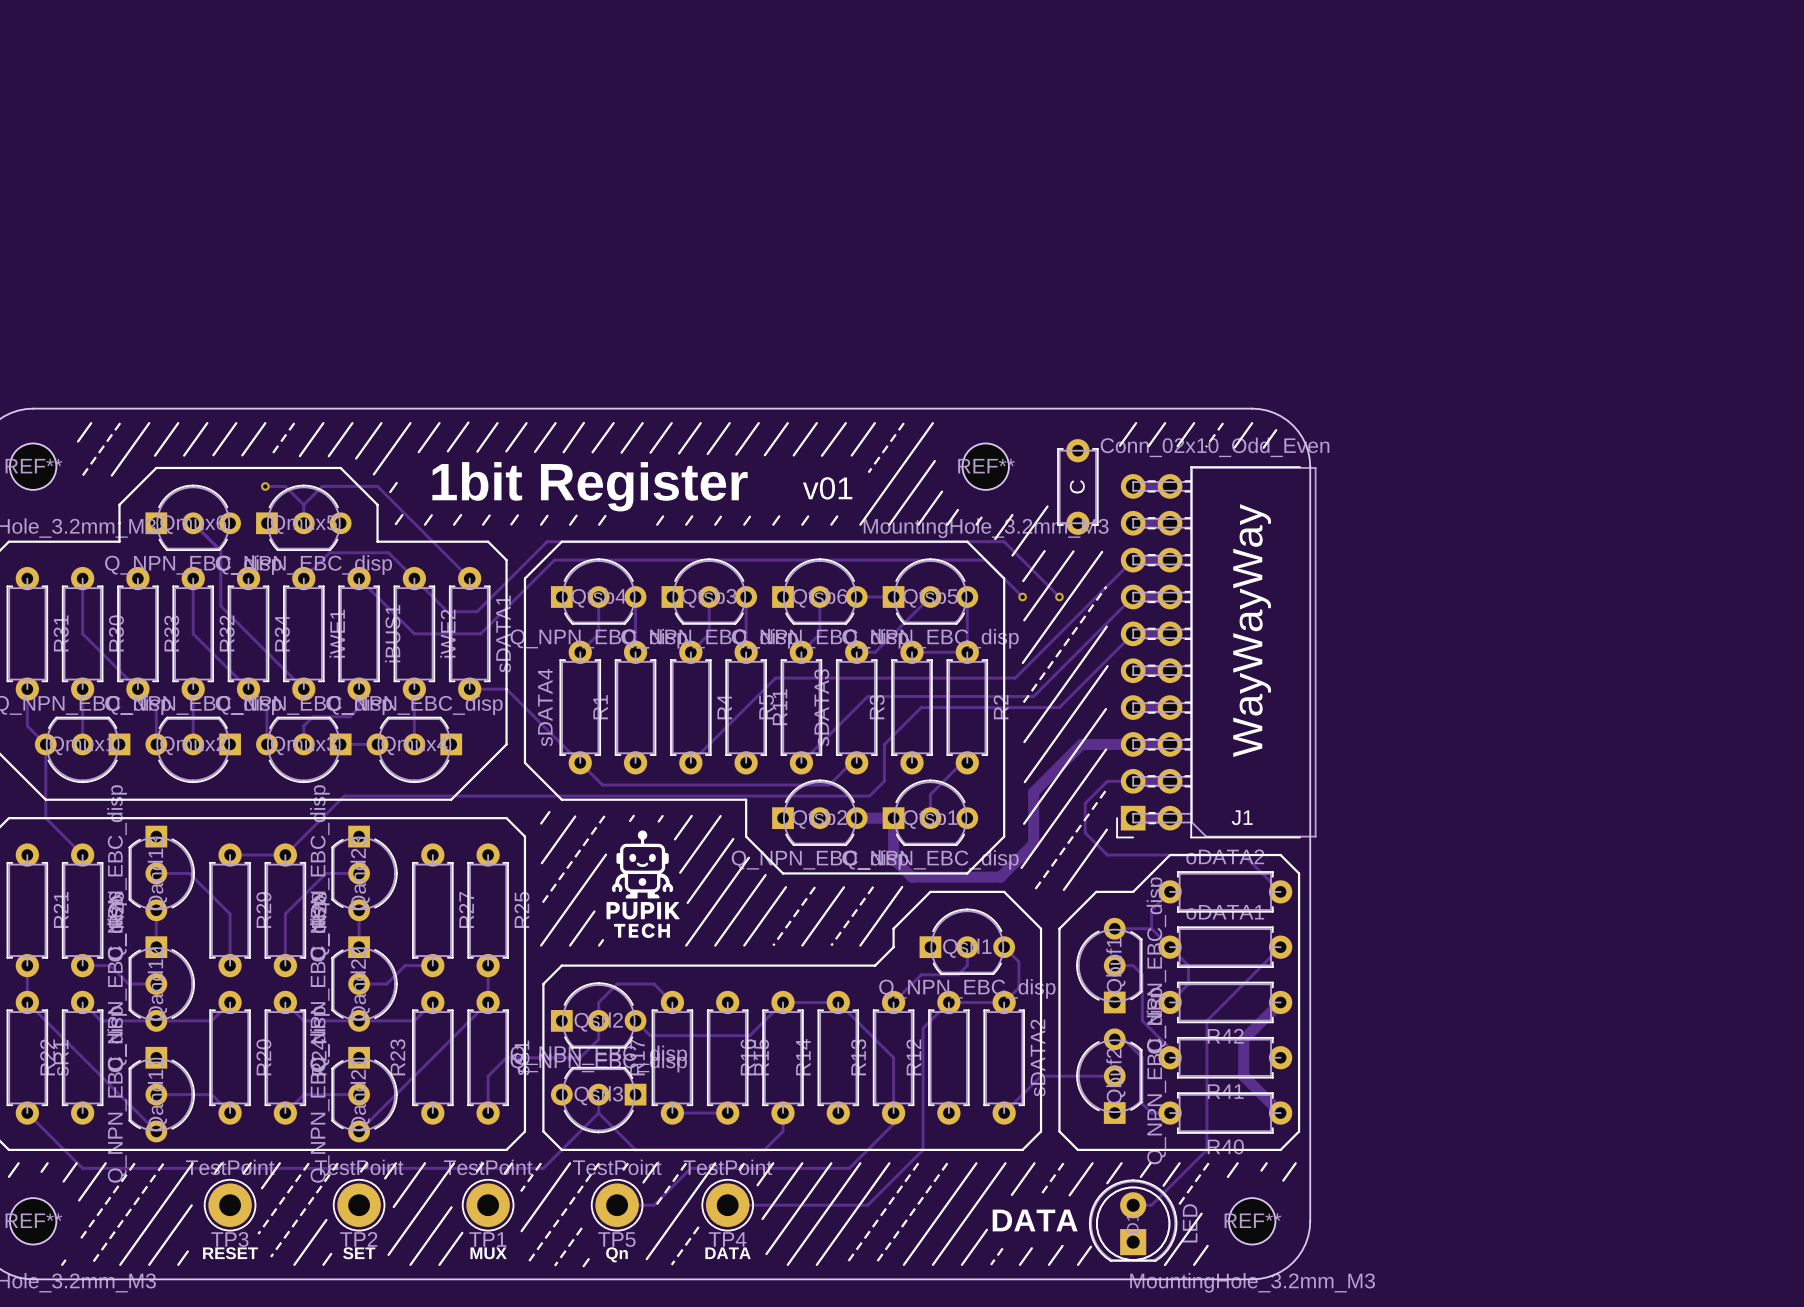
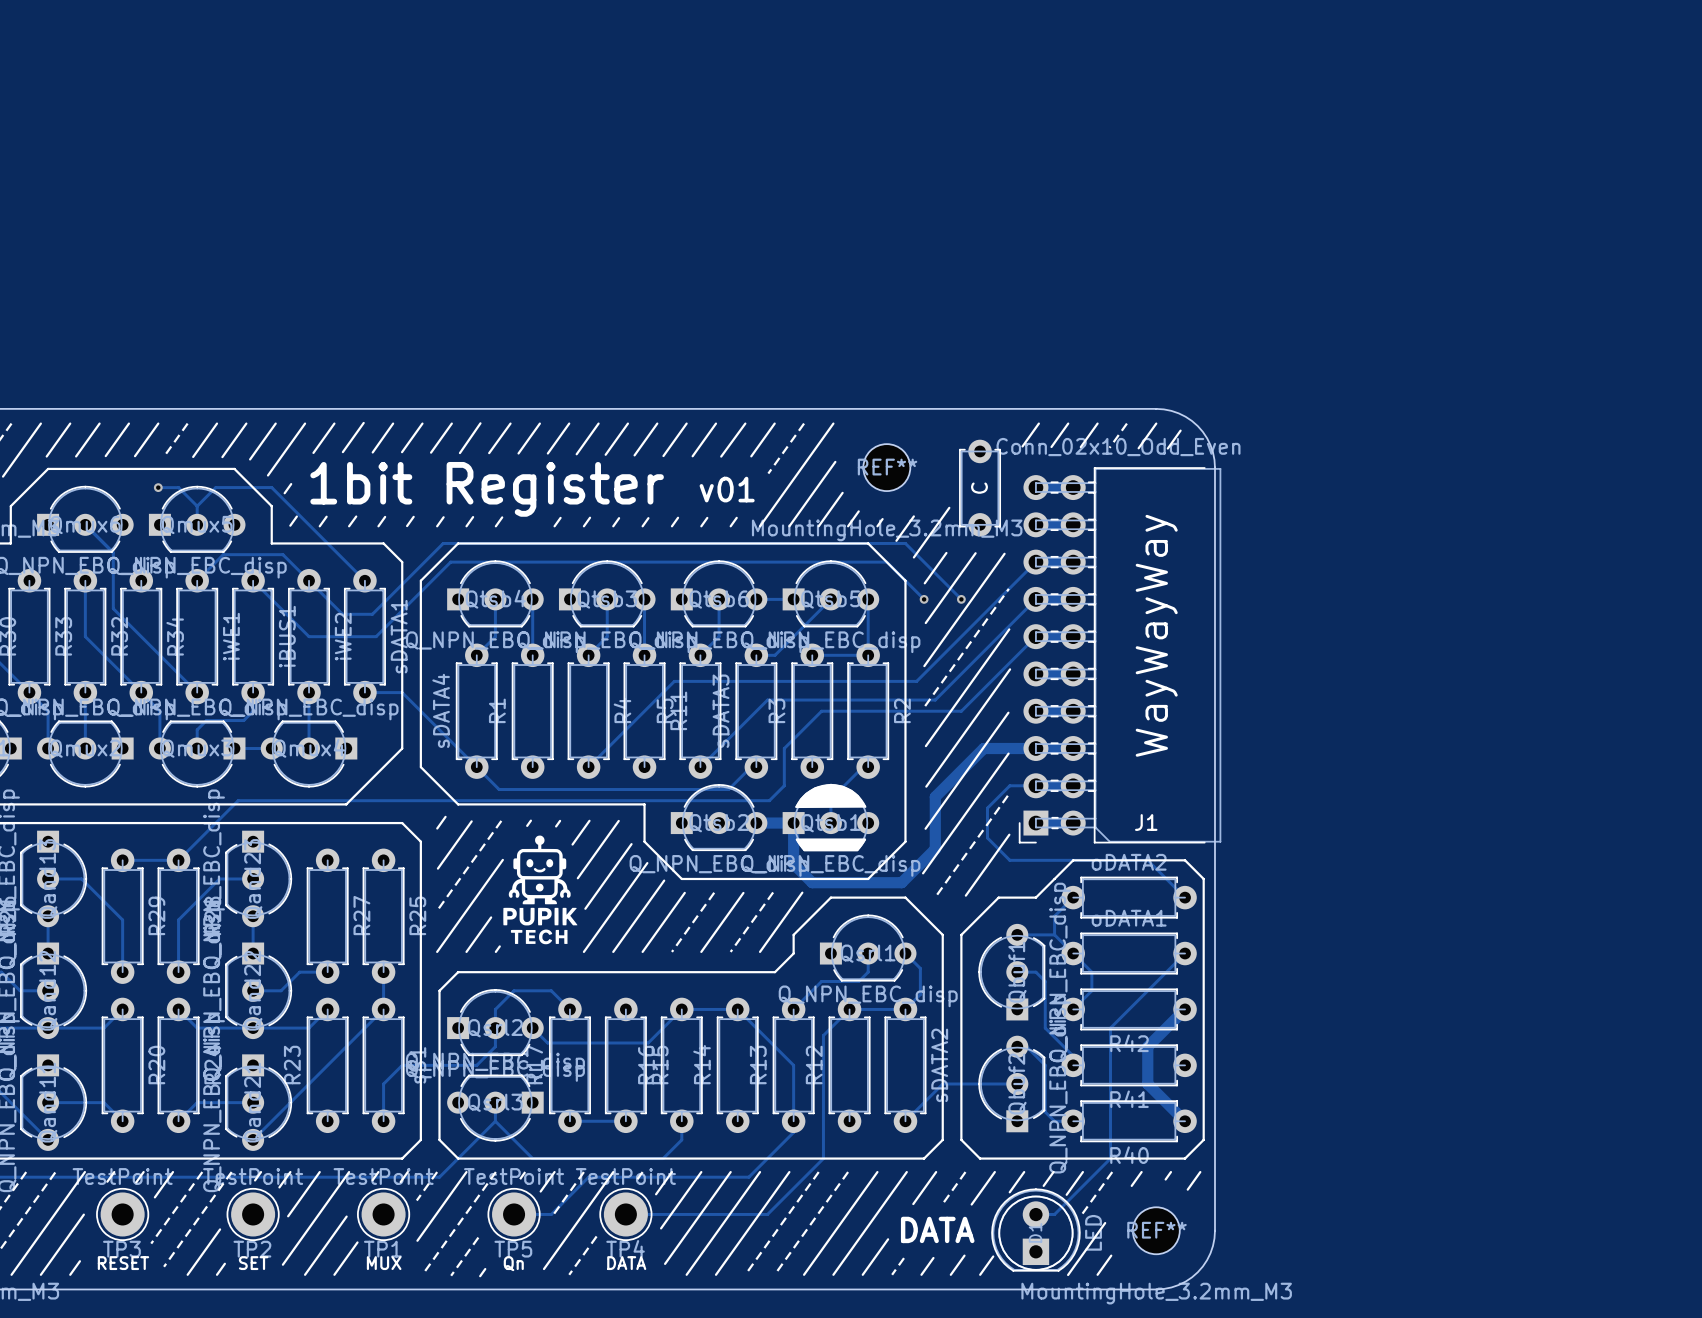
drawing: none -> [795, 783, 867, 809]
drawing: none -> [795, 838, 867, 852]

